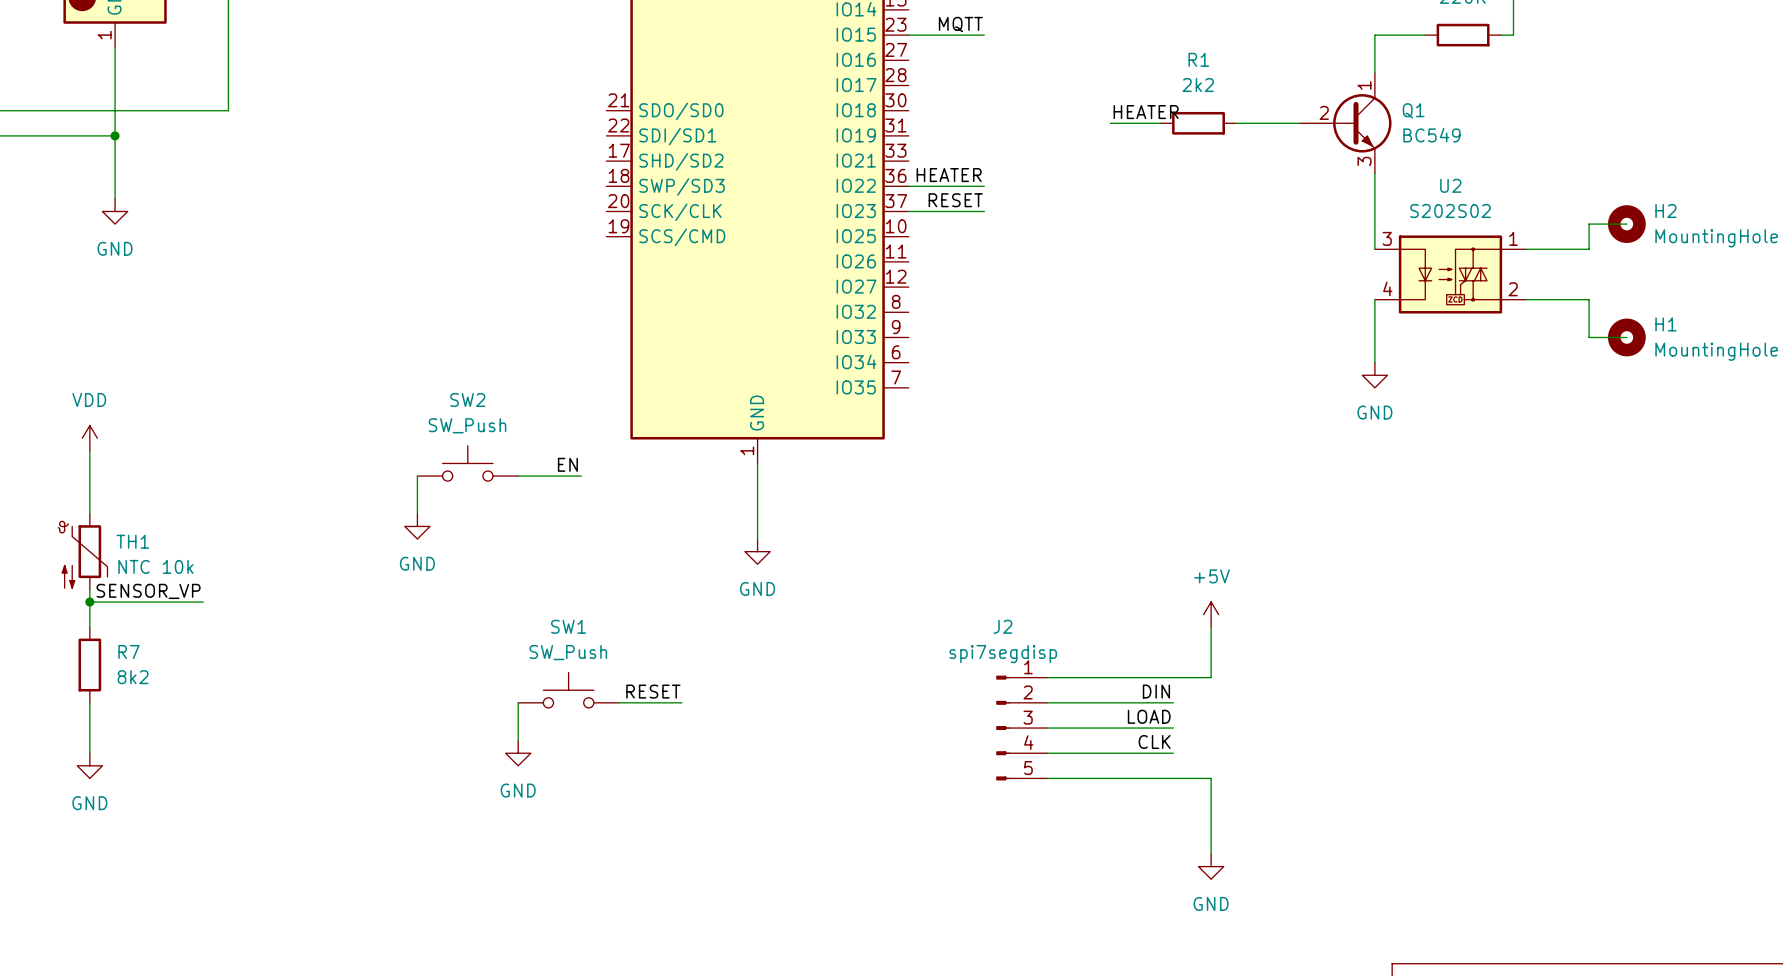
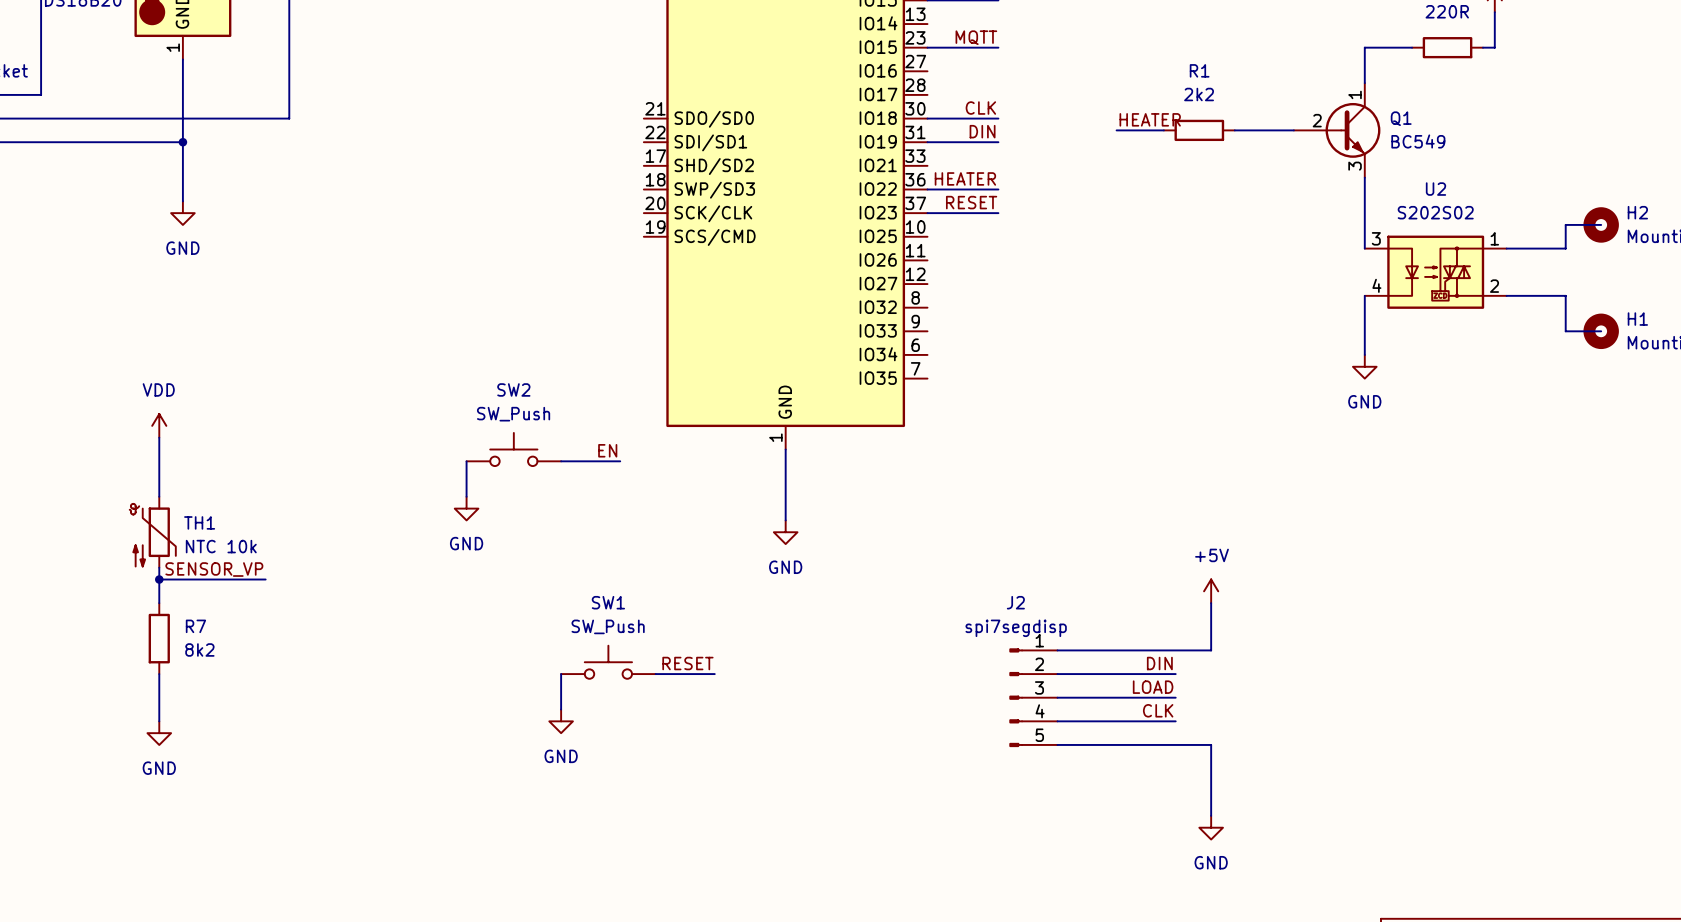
label: none -> CLK (980, 108)
wire: none -> (927, 118) (998, 118)
label: none -> DIN (982, 131)
wire: none -> (927, 142) (998, 142)

